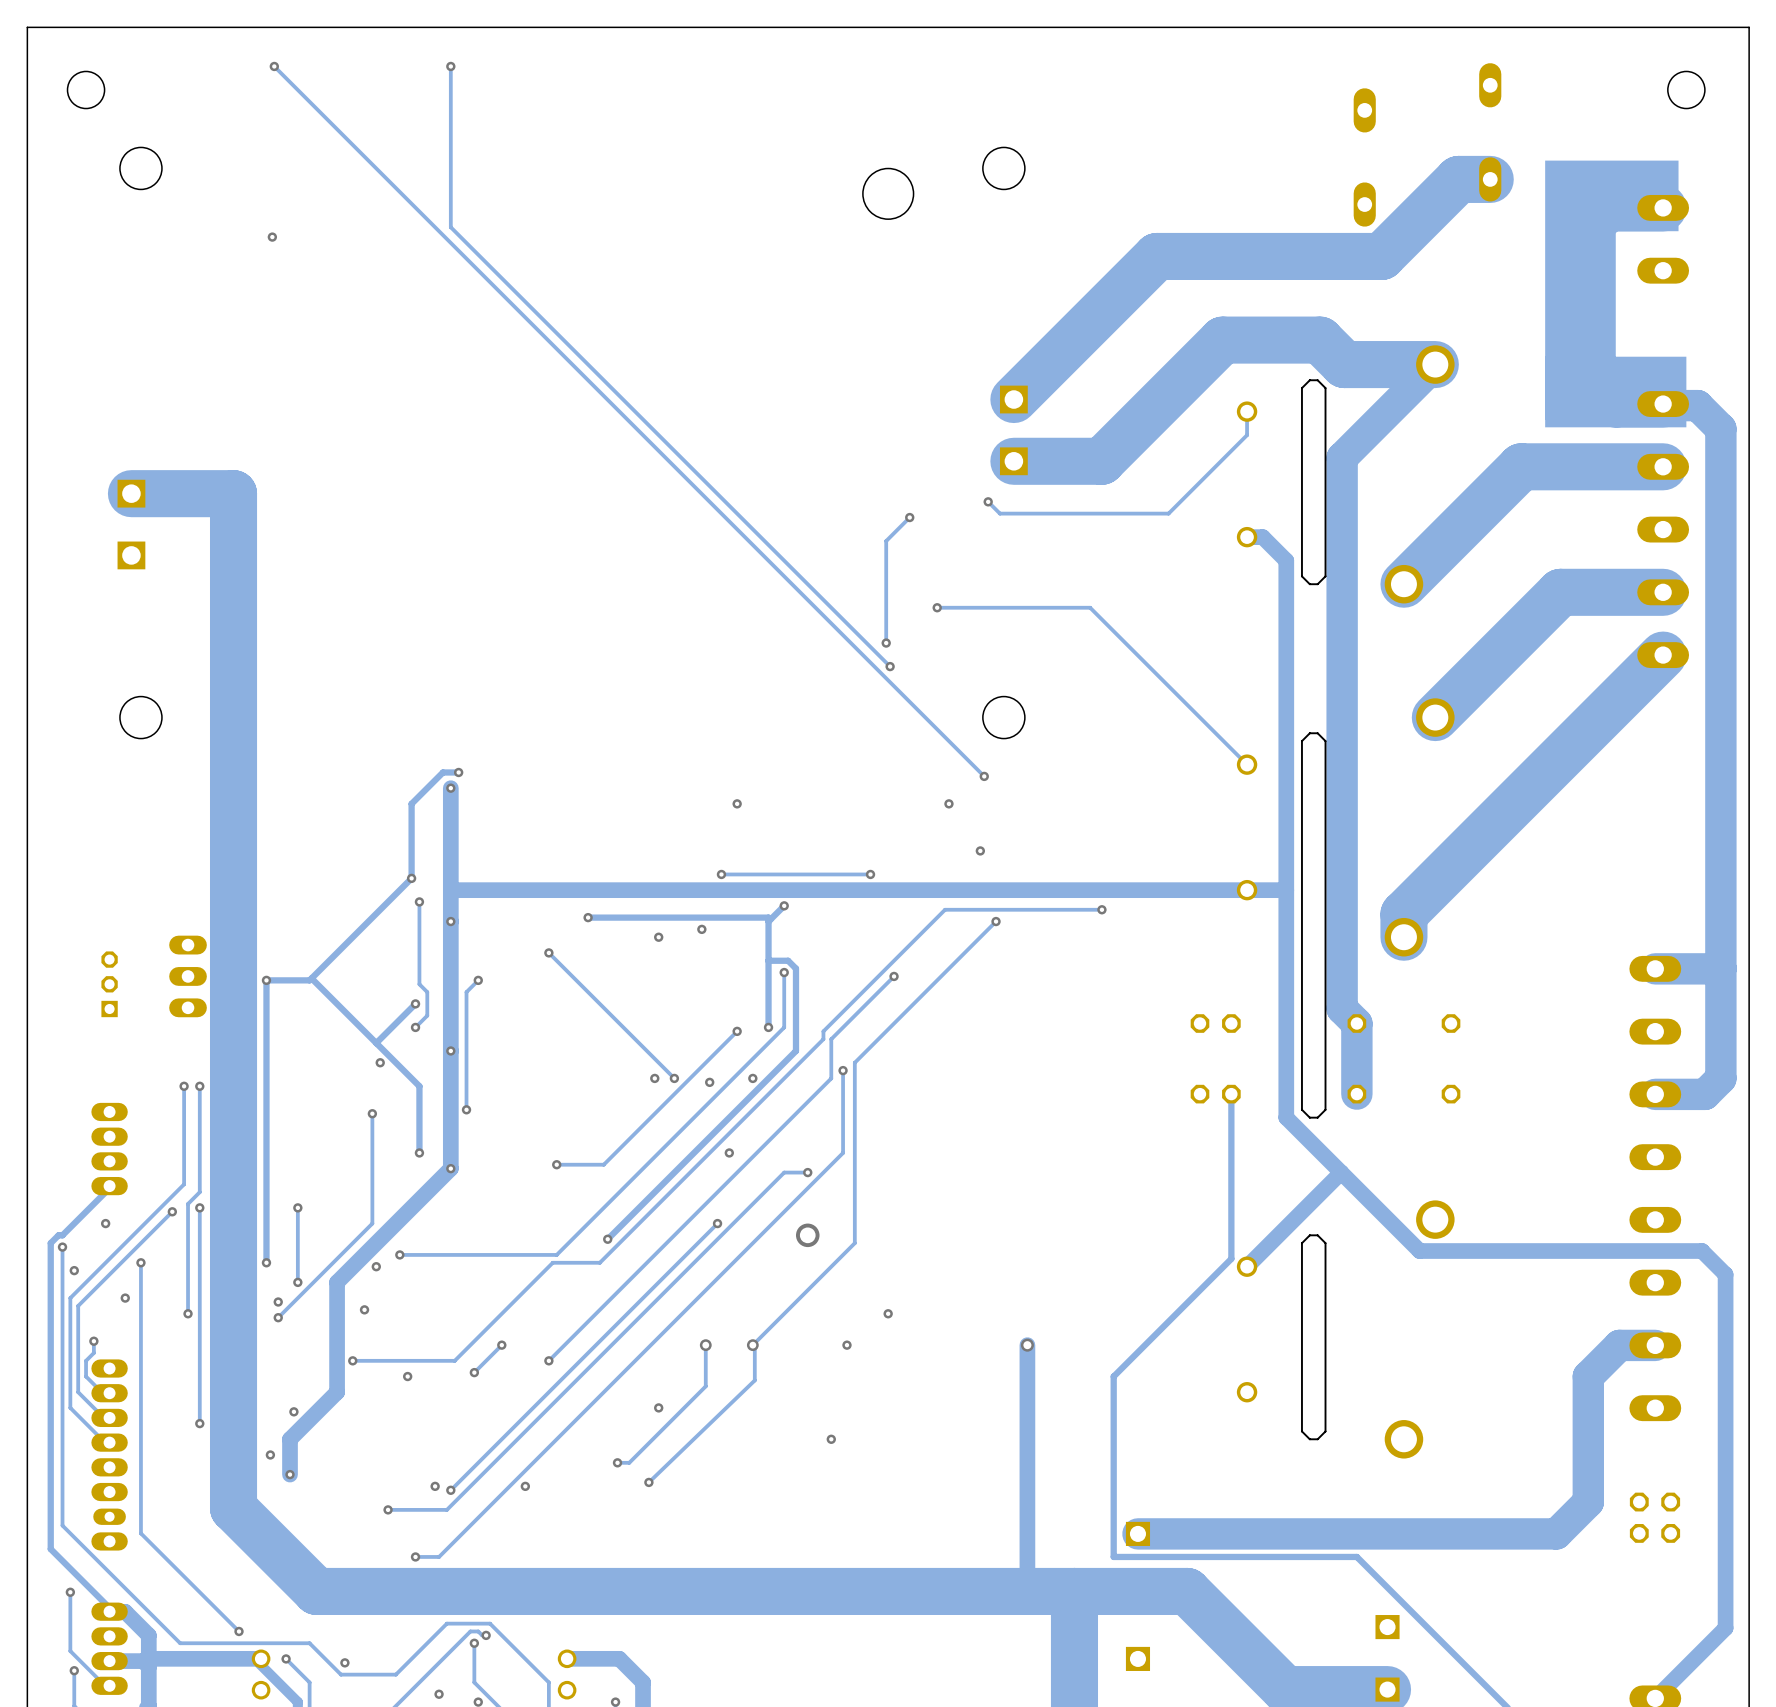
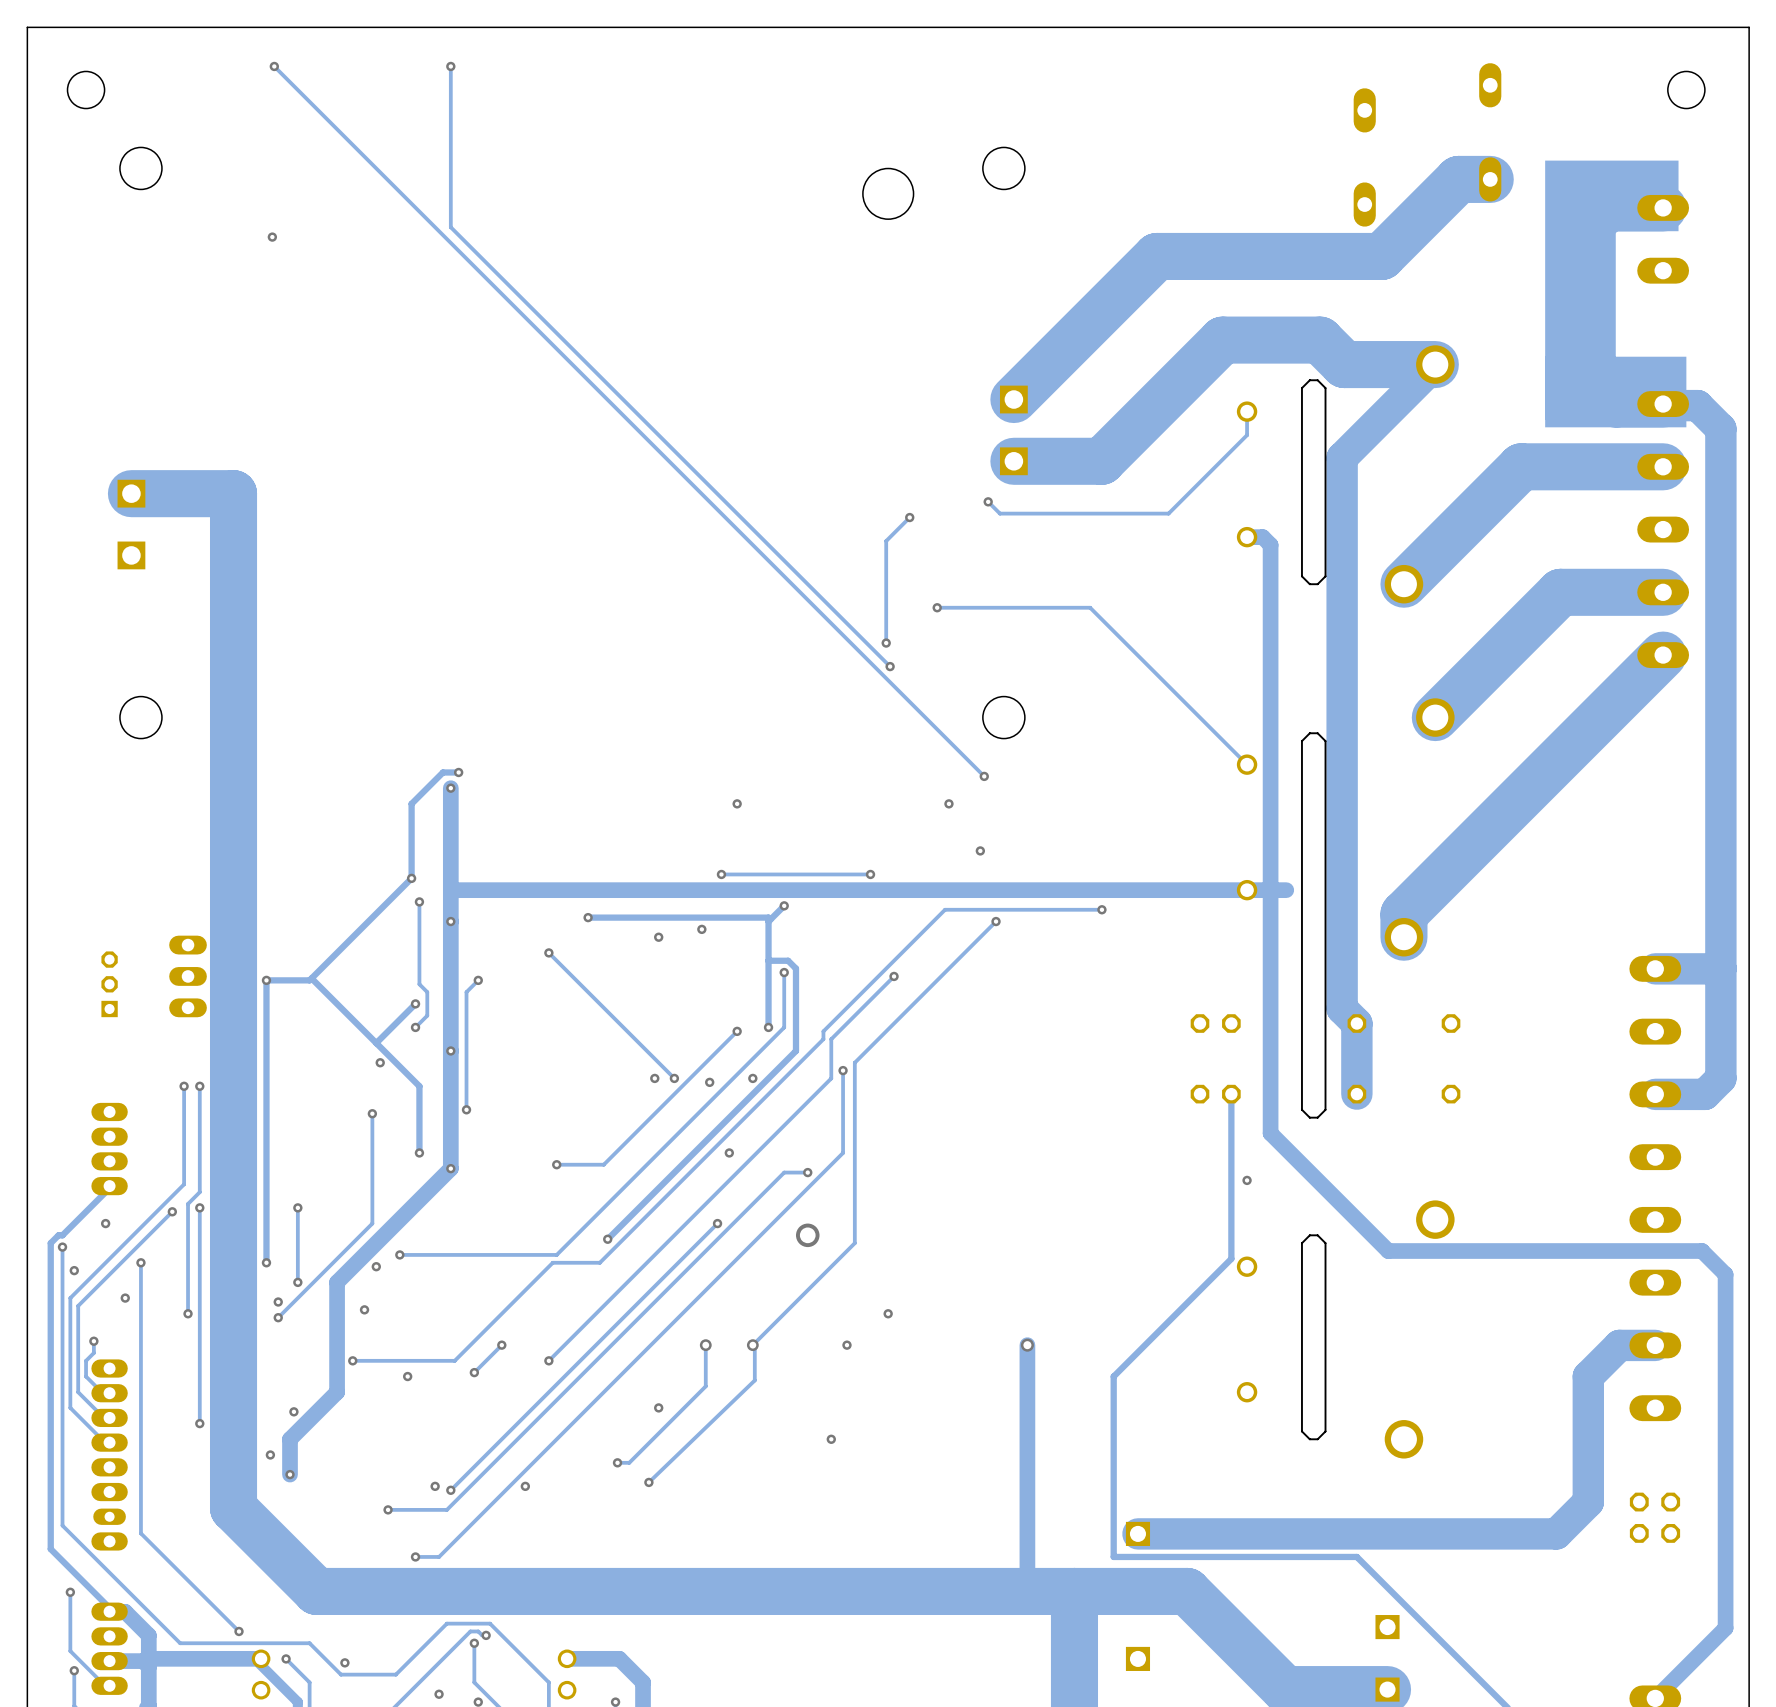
track: (1270, 544) (1286, 560) (1286, 1117) (1419, 1251) -> (1270, 544) (1270, 1133) (1388, 1251) (1419, 1251)
track: (1341, 1172) (1247, 1266) -> none
via: none -> (1247, 1180)

